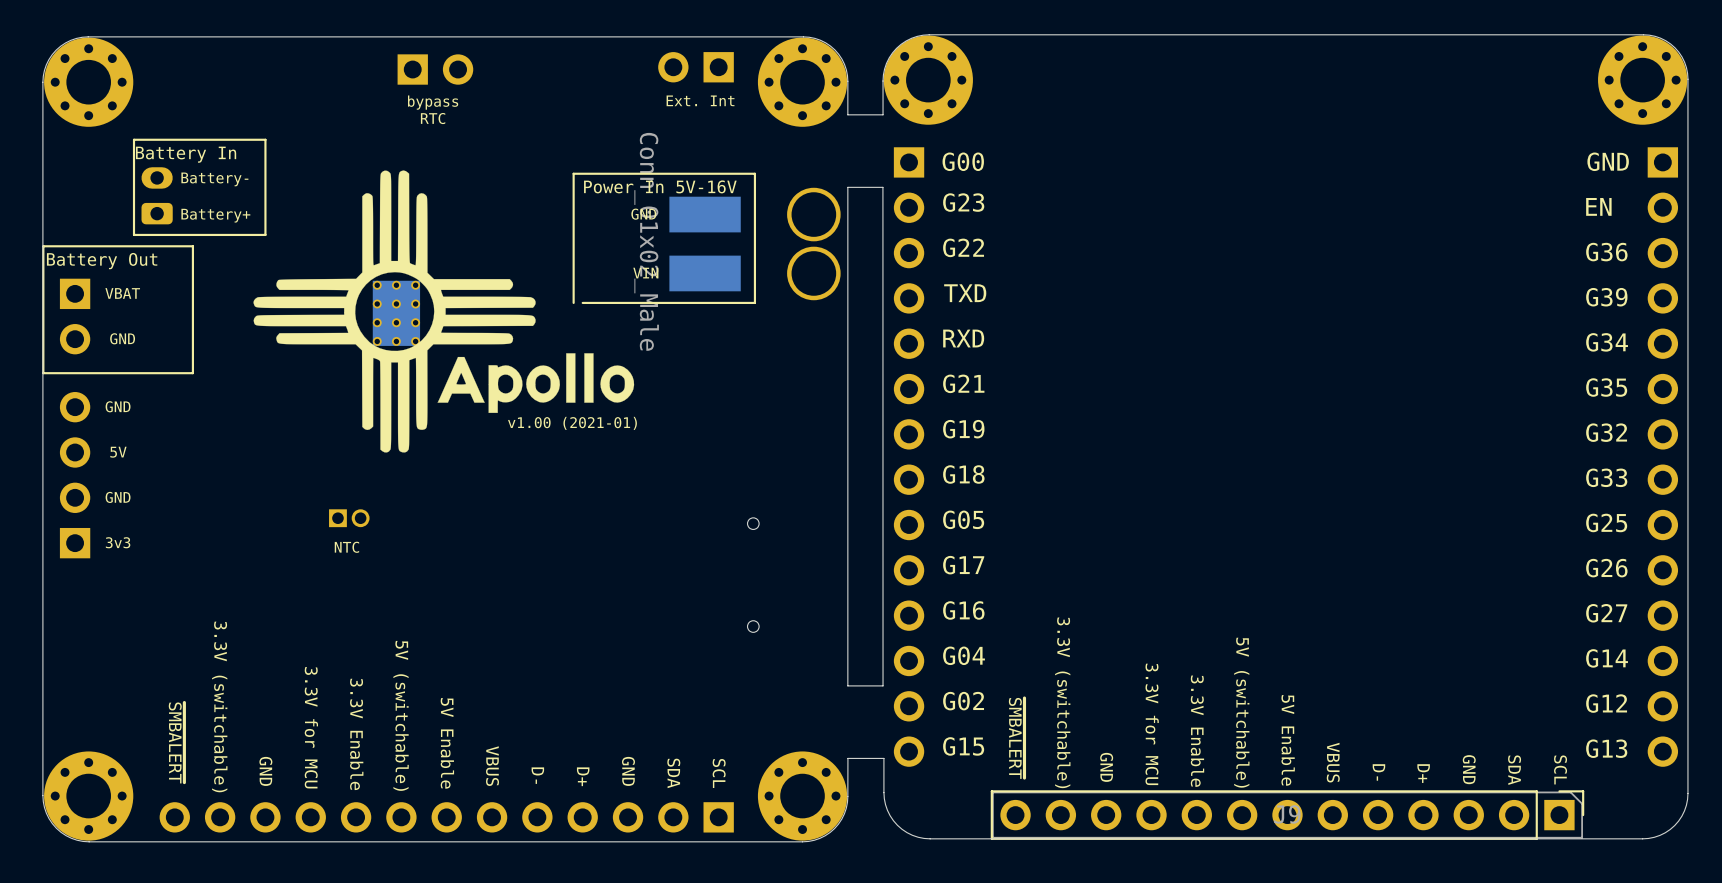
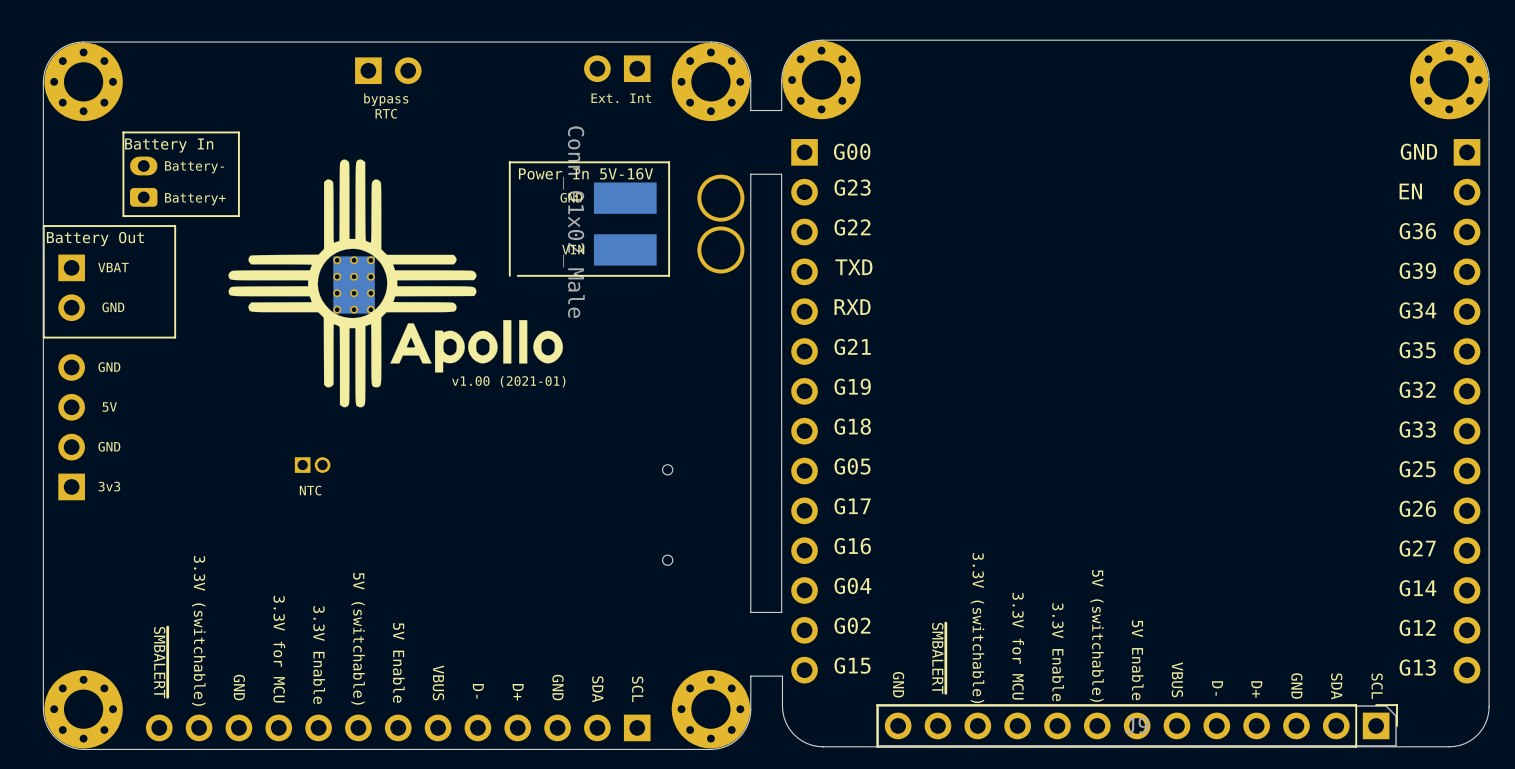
text position: 3.3V (switchable) (1062, 702) -> 3.3V (switchable) (977, 628)
text position: ~{SMBALERT} (1016, 738) -> ~{SMBALERT} (938, 658)
text position: GND (1106, 767) -> GND (898, 684)

